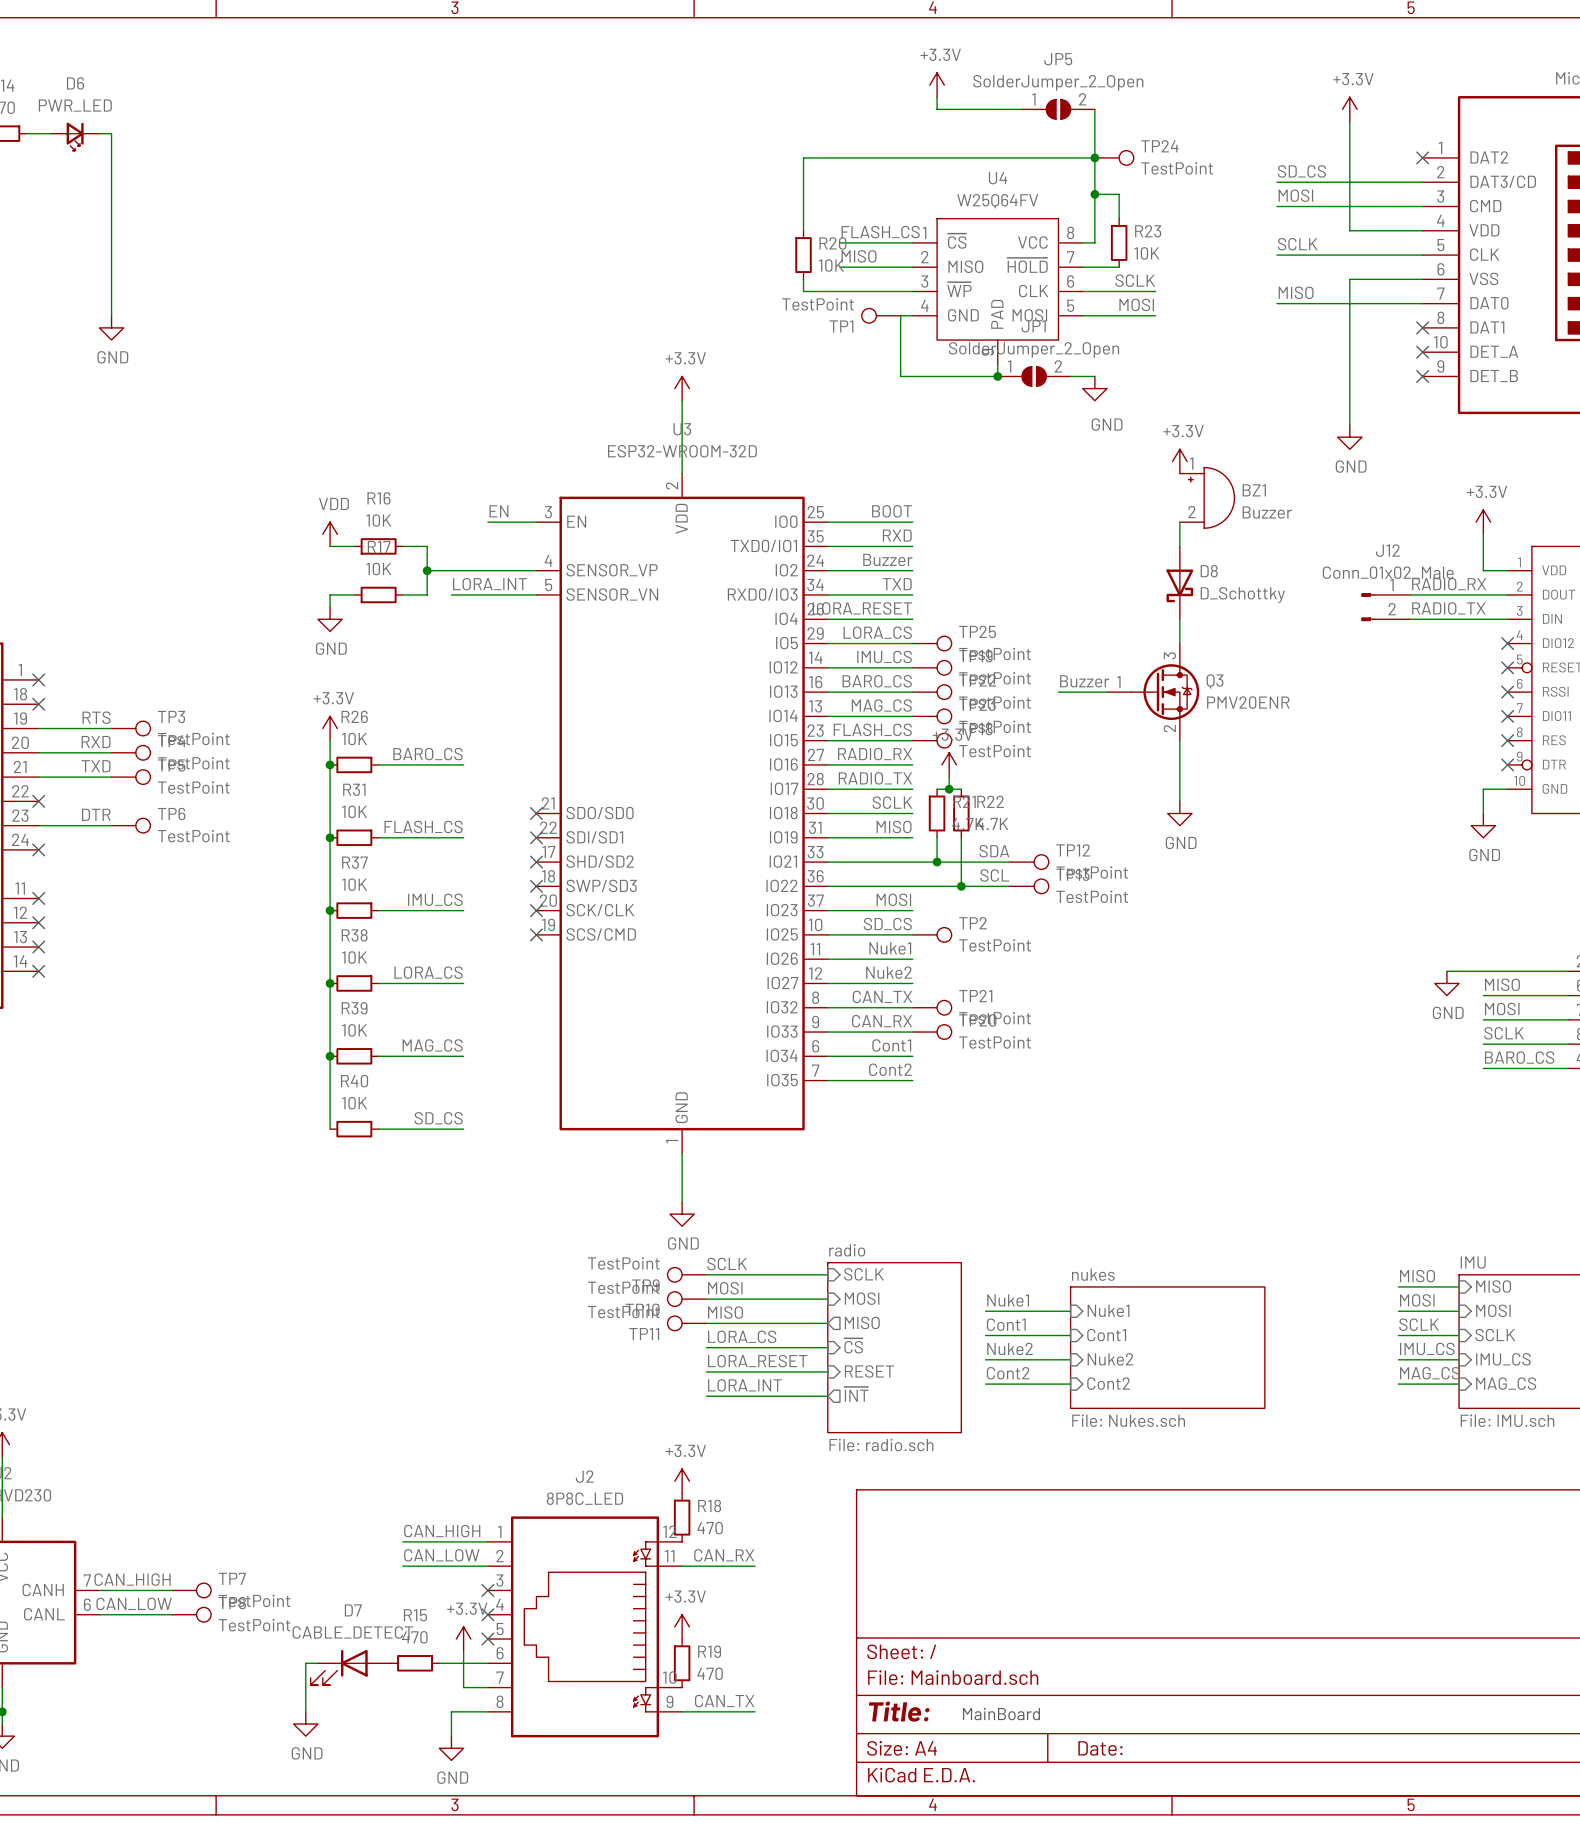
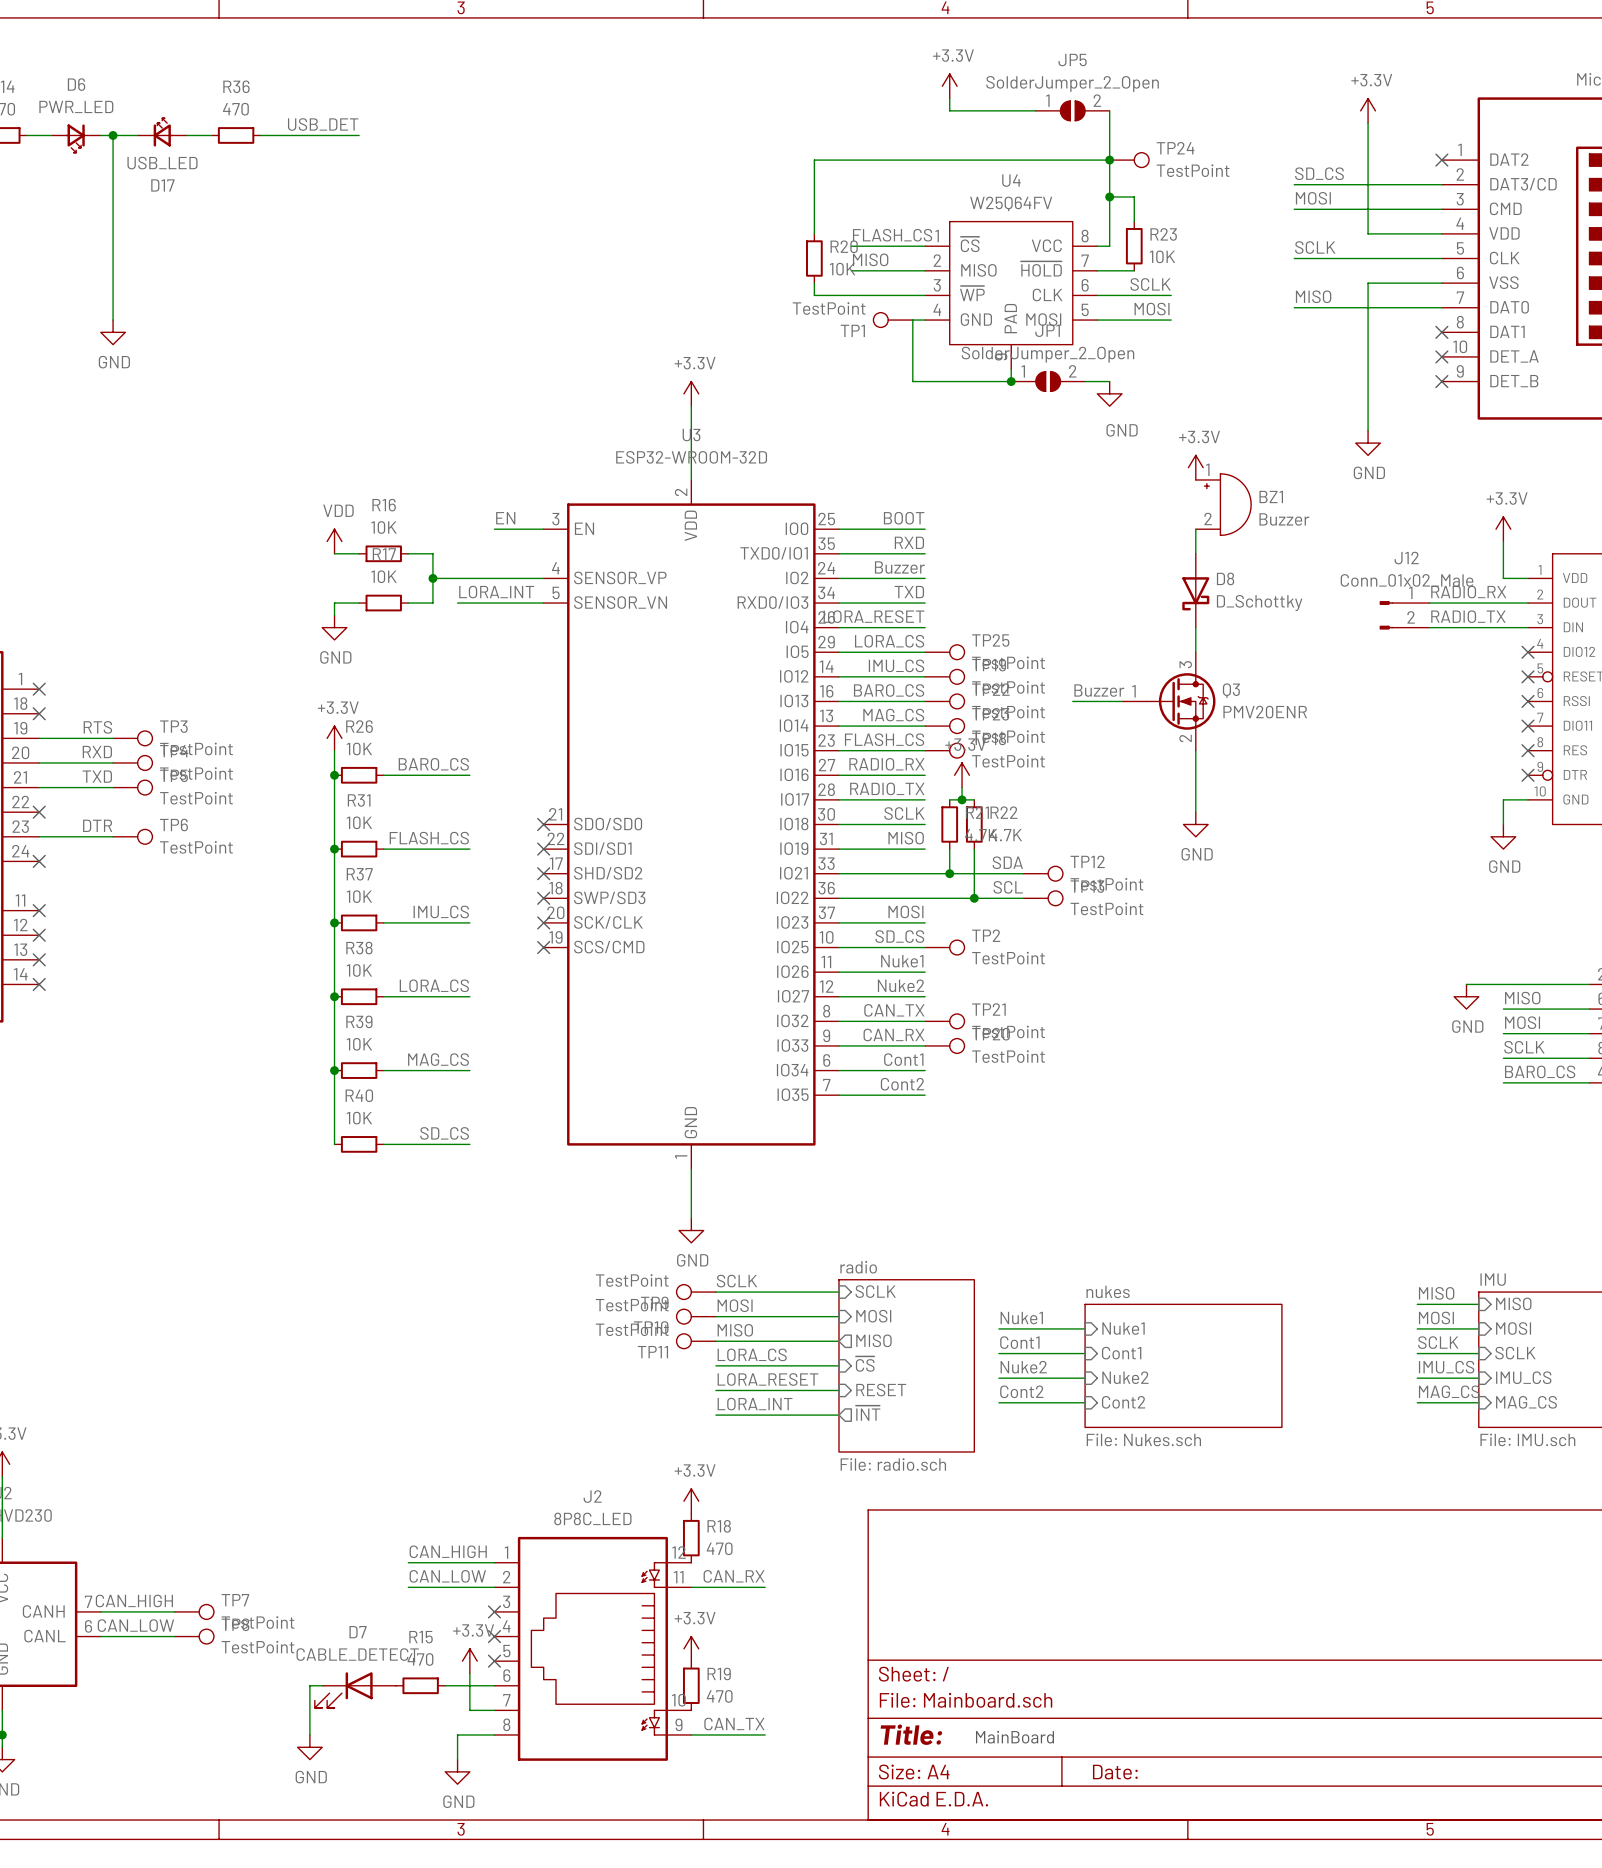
label: none -> USB_DET (323, 124)
D17: none -> USB_LED (162, 132)
wire: none -> (113, 135) (137, 135)
junction: none -> (113, 135)
wire: none -> (186, 135) (211, 135)
R36: none -> 470 (236, 135)
wire: none -> (260, 135) (359, 135)

